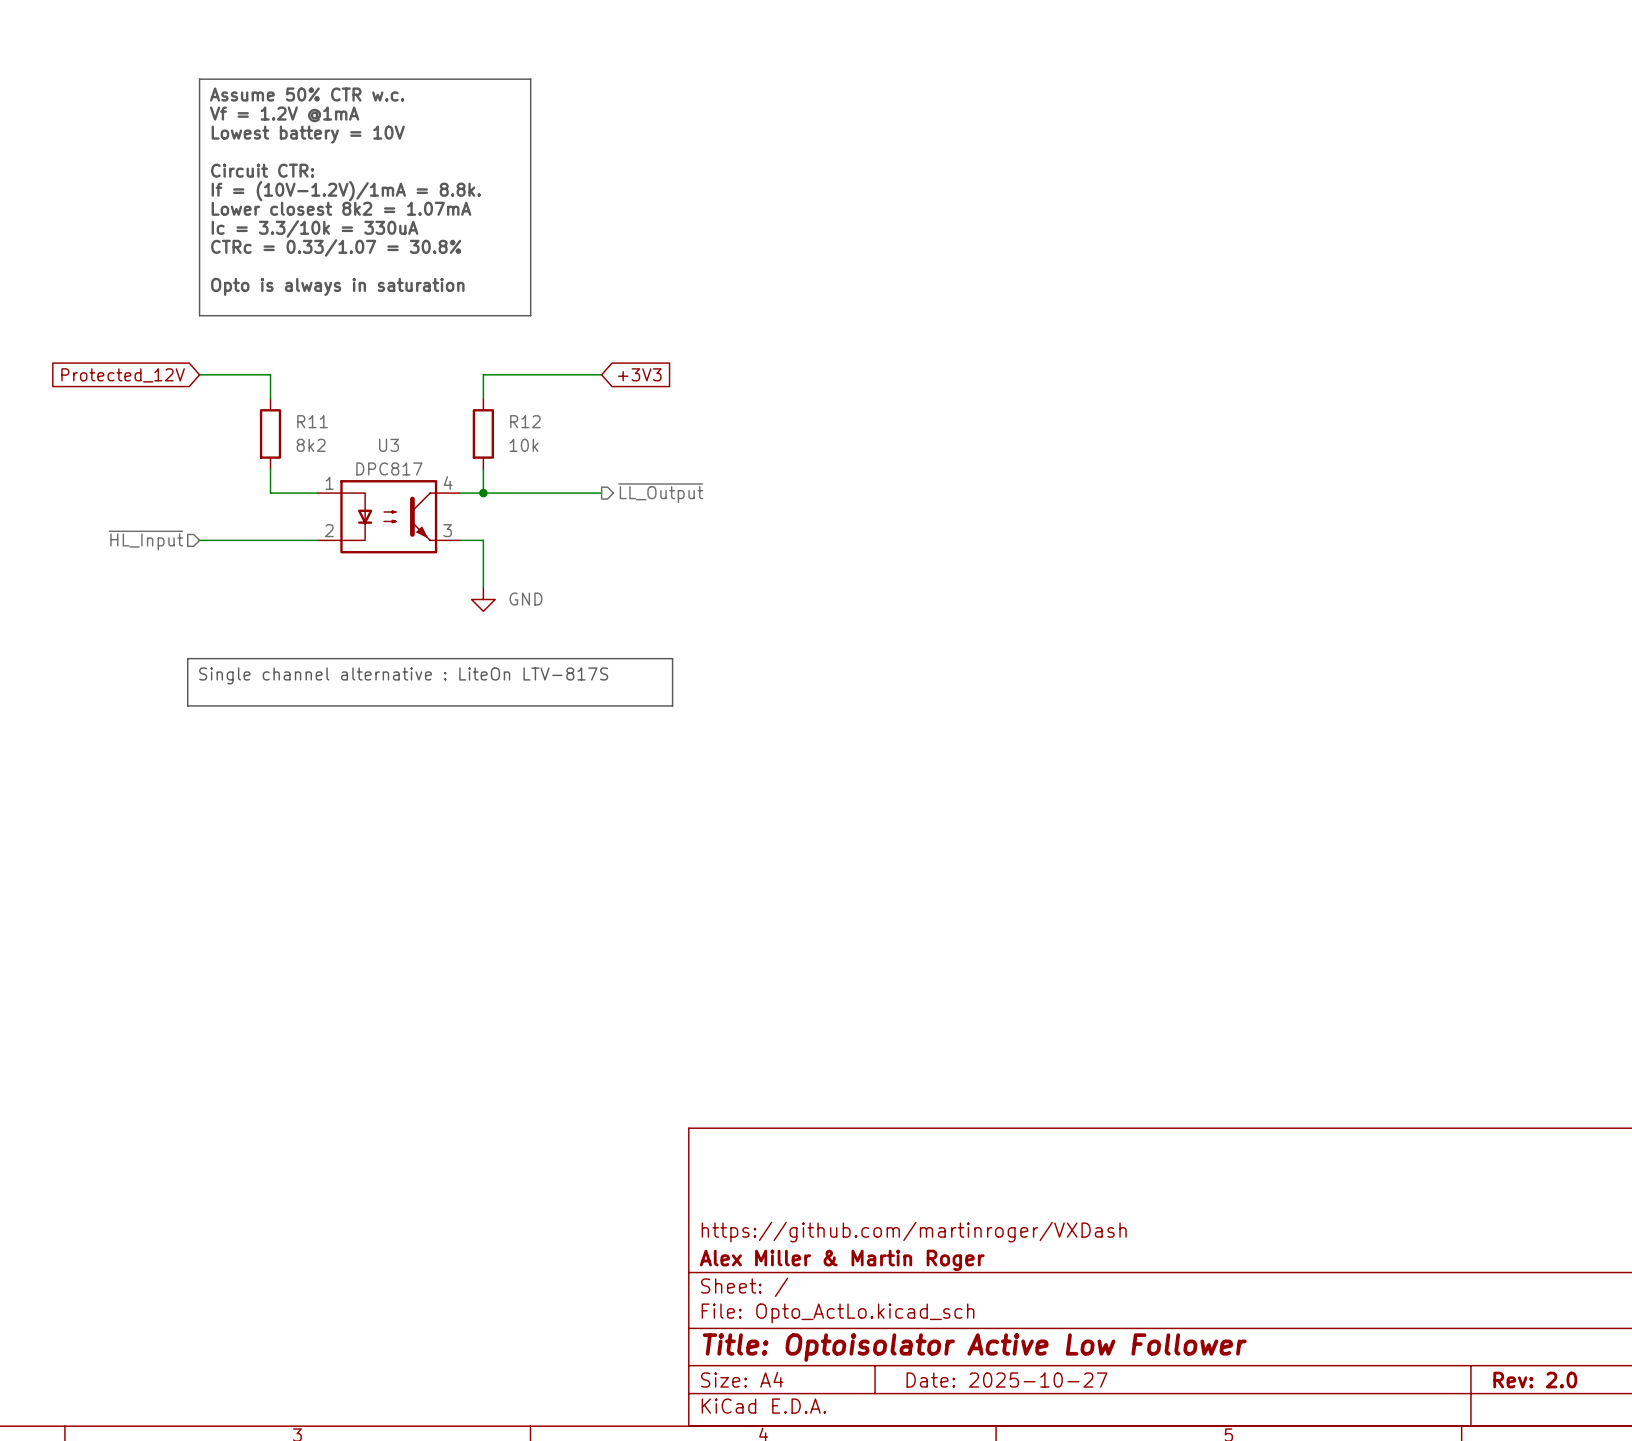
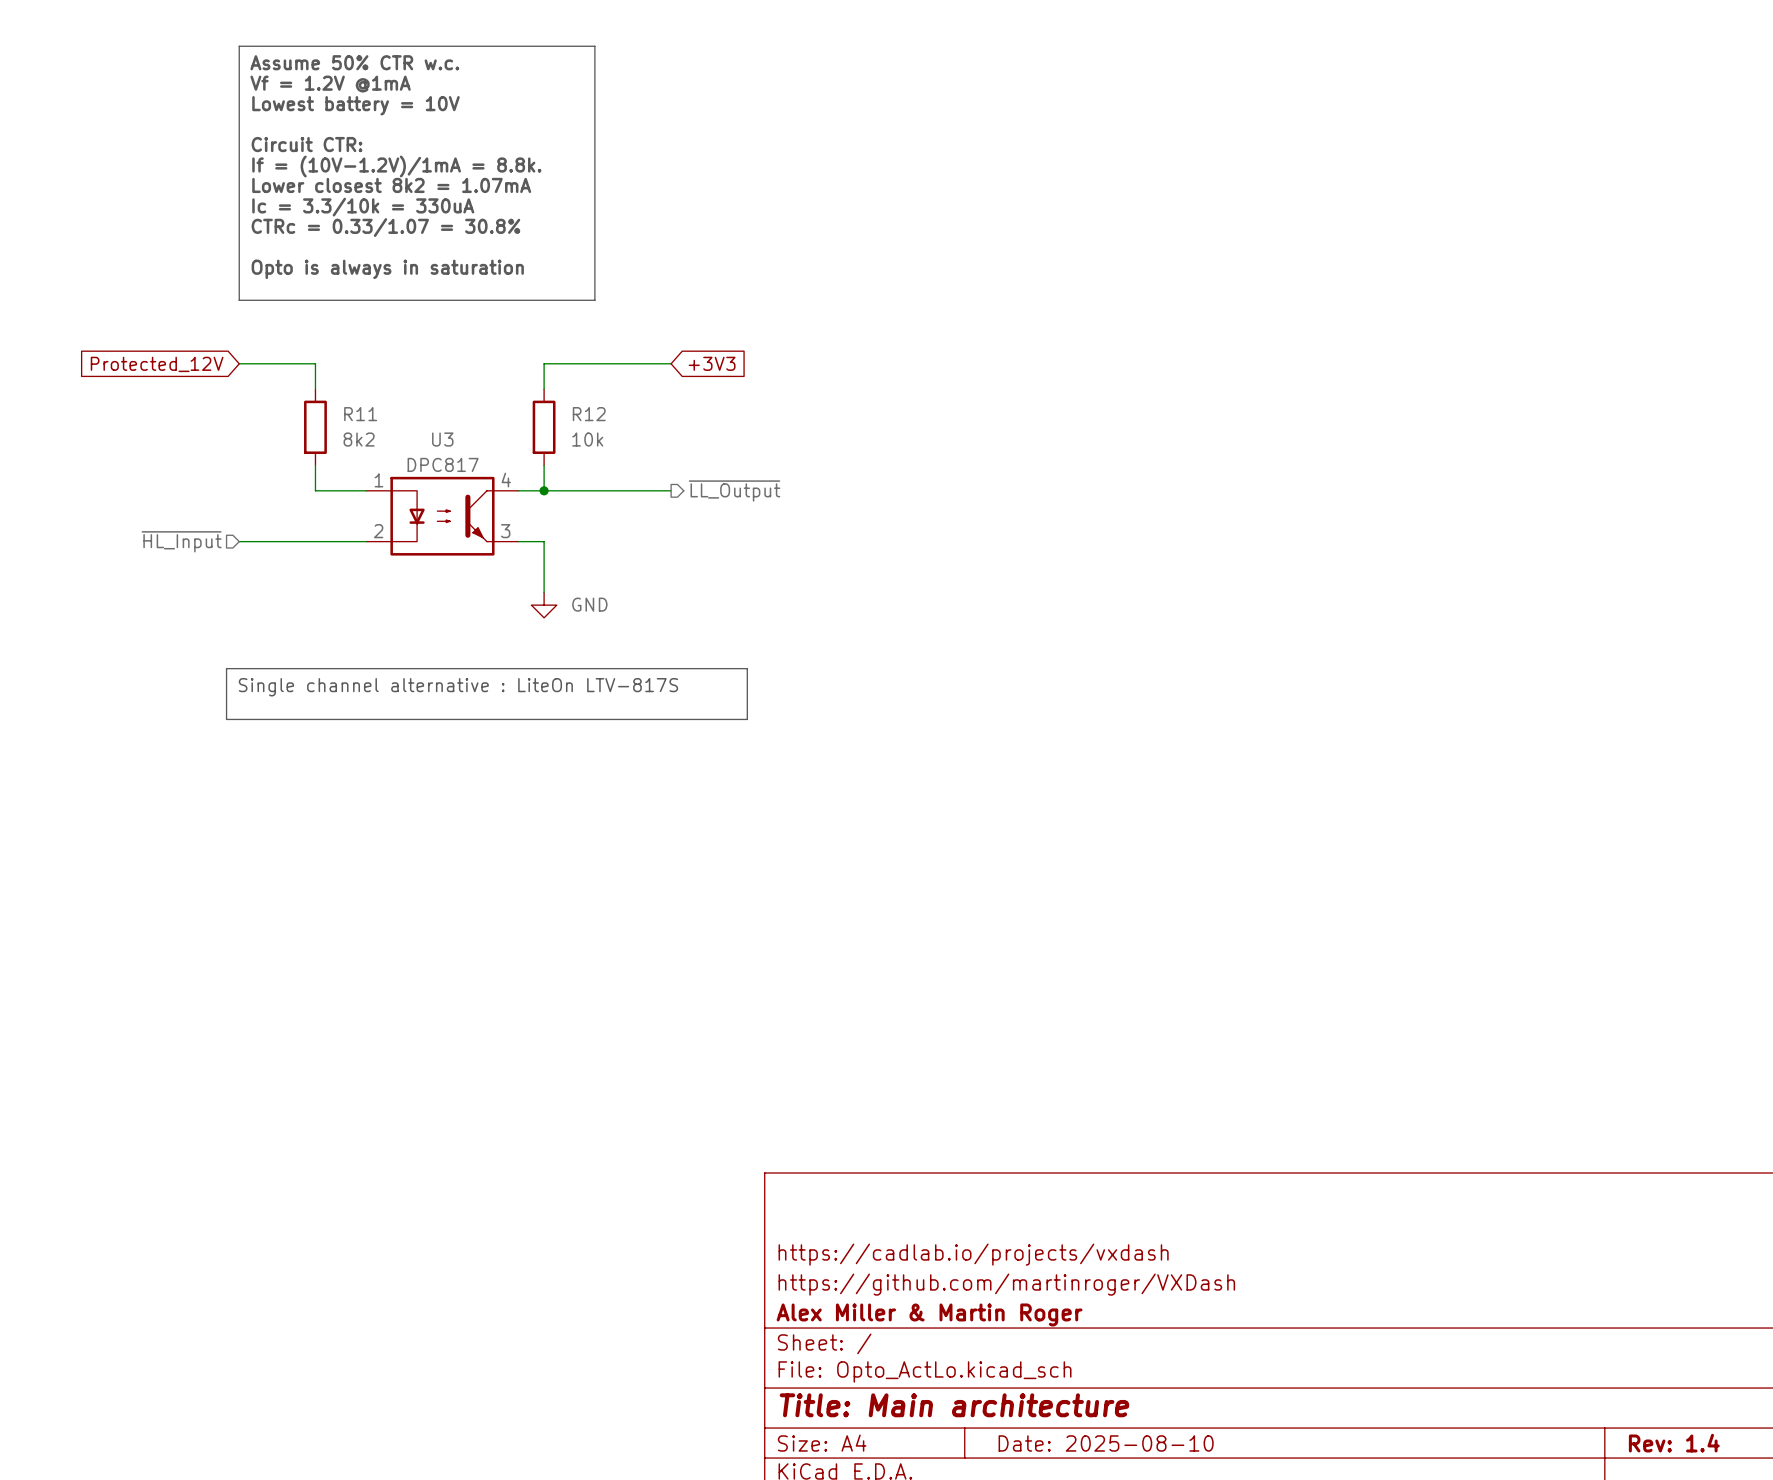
title block: none -> https://cadlab.io/projects/vxdash (973, 1254)
title block: Title: Optoisolator Active Low Follower (974, 1347) -> Title: Main architecture (954, 1405)
title block: Date: 2025-10-27 (1006, 1380) -> Date: 2025-08-10 (1106, 1443)
title block: Rev: 2.0 (1535, 1380) -> Rev: 1.4 (1674, 1443)

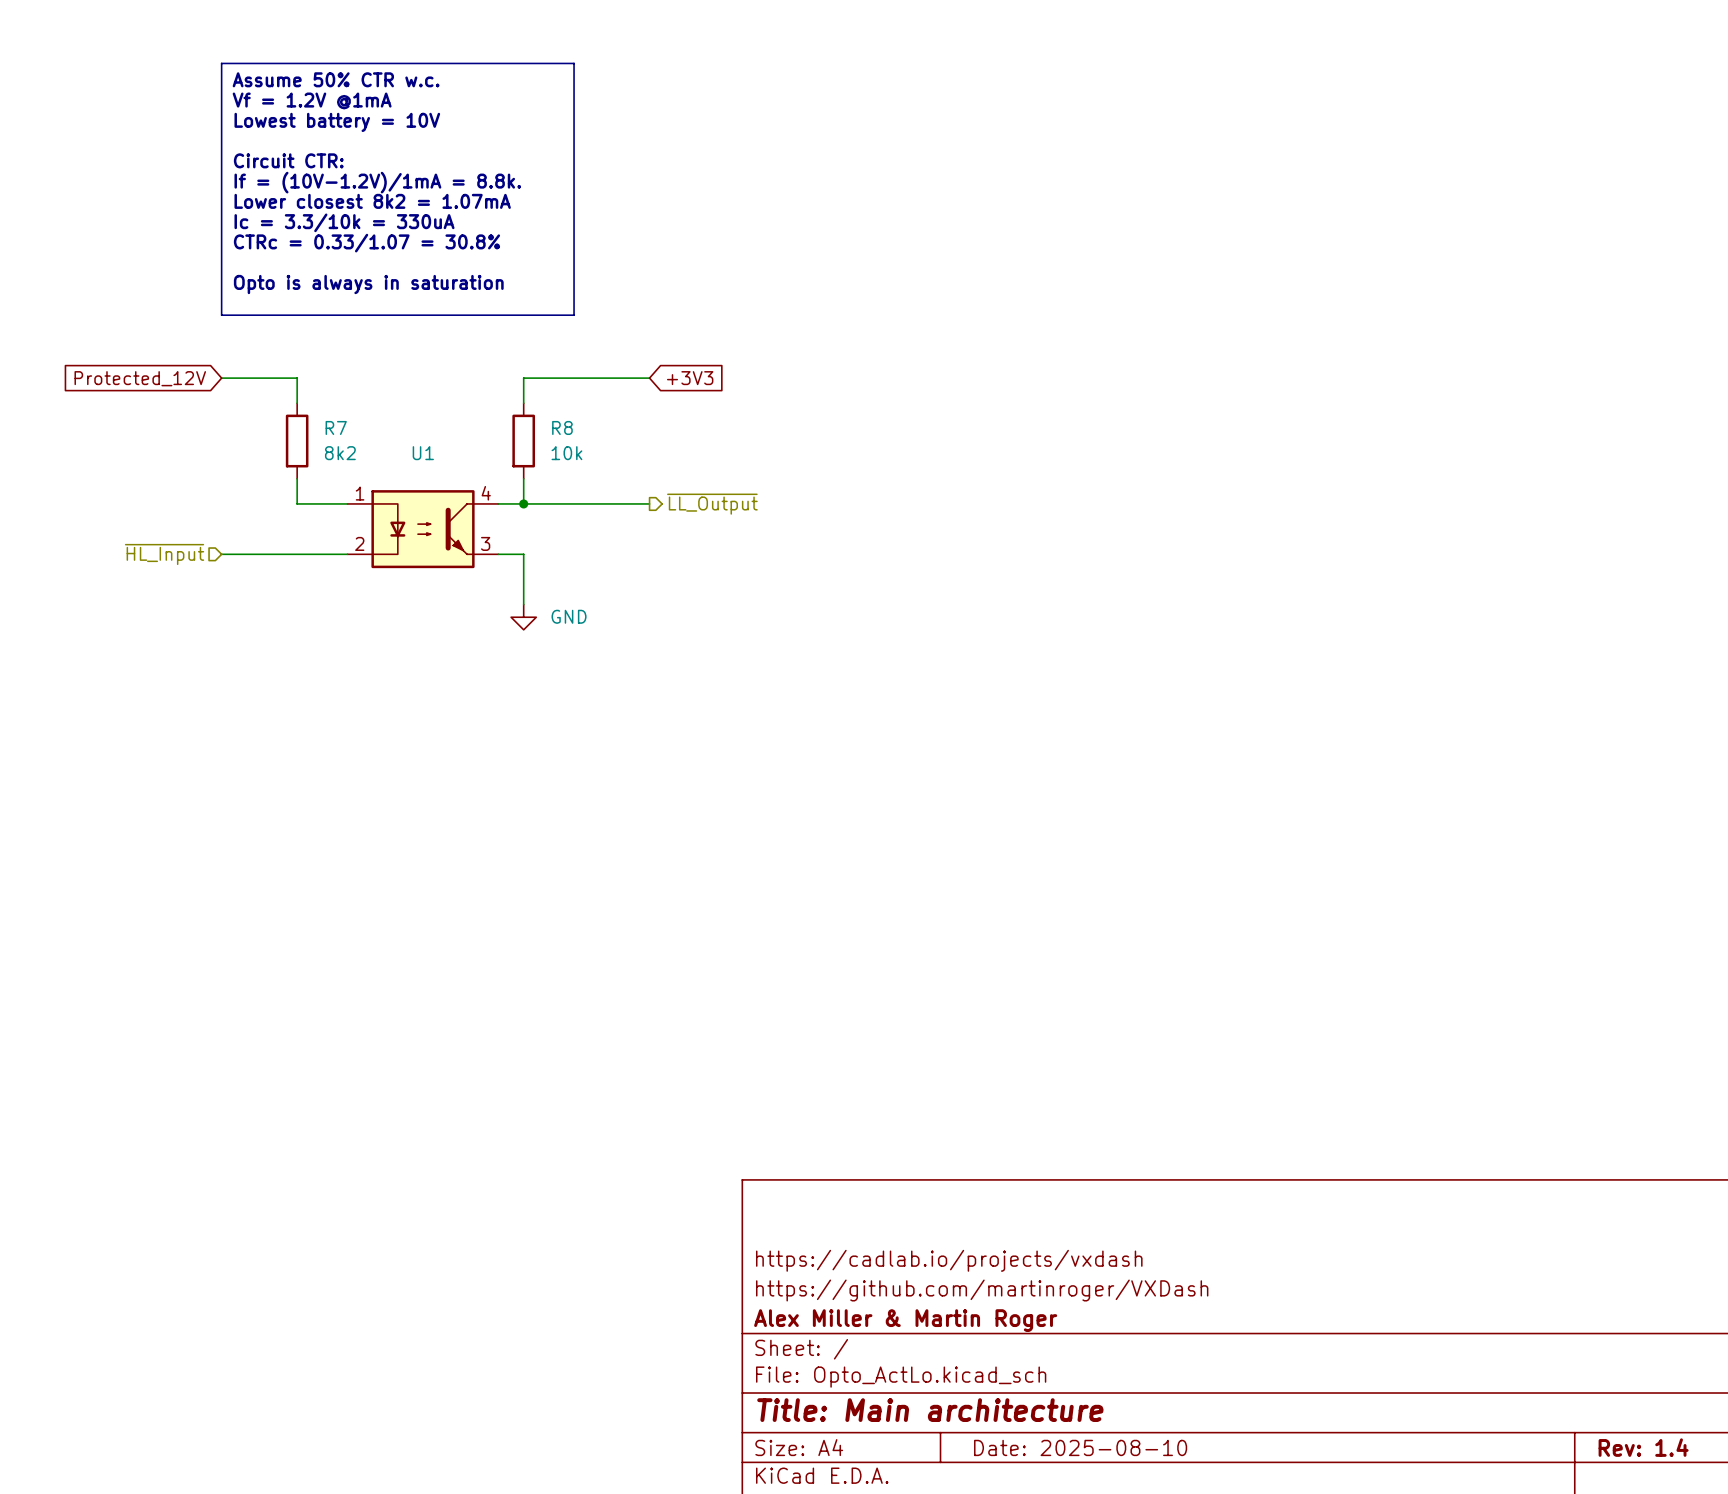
R11 name: R11 (360, 414) -> R7 (336, 427)
R12 name: R12 (589, 414) -> R8 (562, 427)
U3 name: U3 (442, 439) -> U1 (423, 453)
U3 value: DPC817 (443, 464) -> none
line: (226, 668) (747, 668) (747, 719) (226, 719) (226, 668) -> none
text: Single channel alternative : LiteOn LTV-817S (458, 687) -> none

